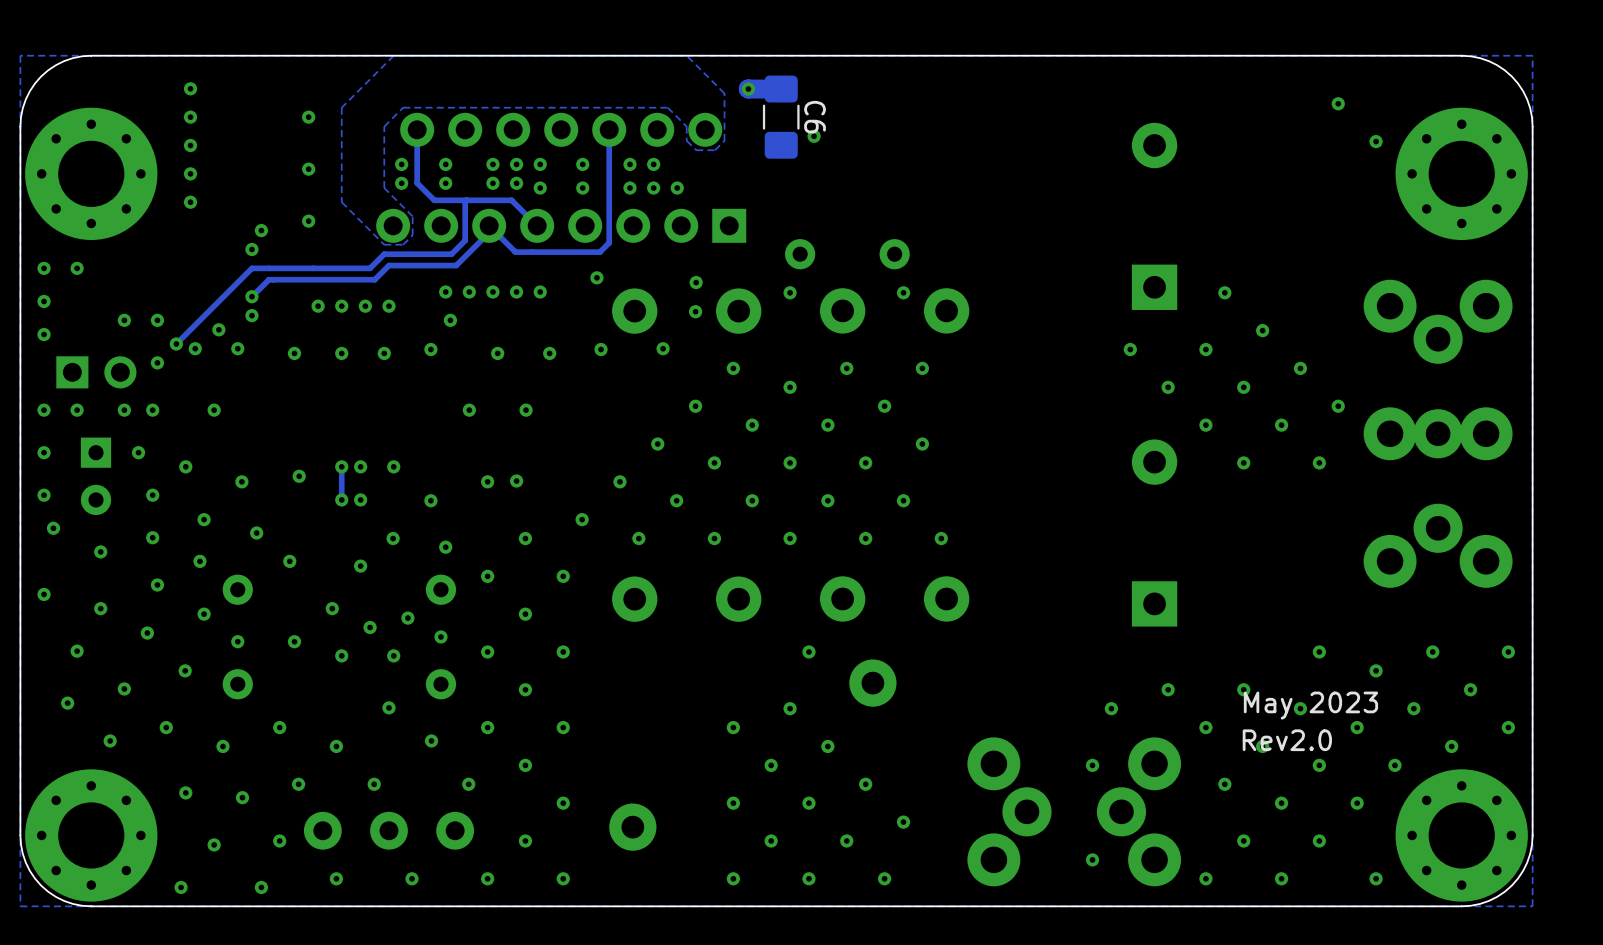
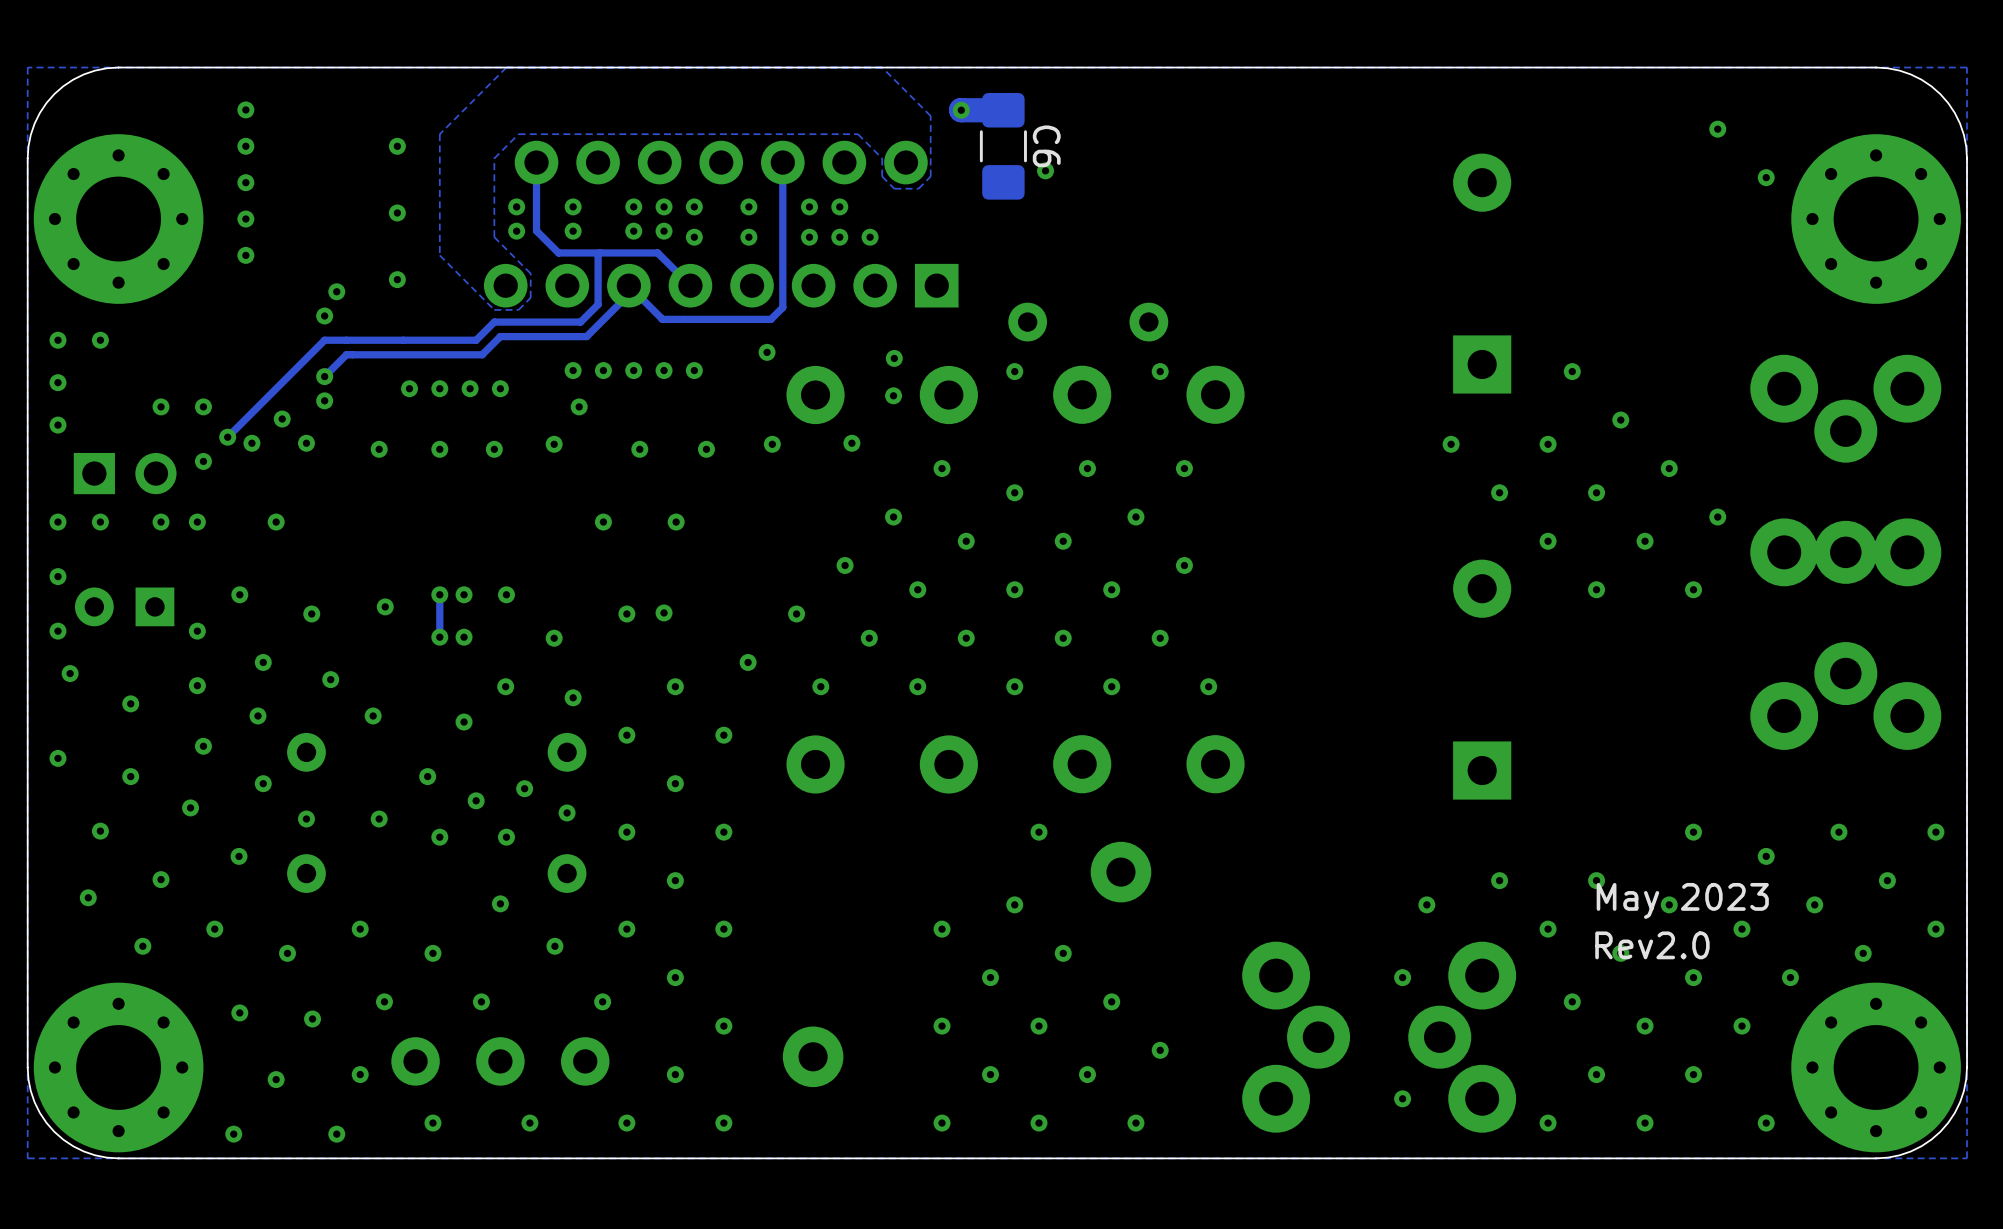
via: (138, 452) -> none
part rotation: 0° (96, 476) -> 90° clockwise (124, 606)

